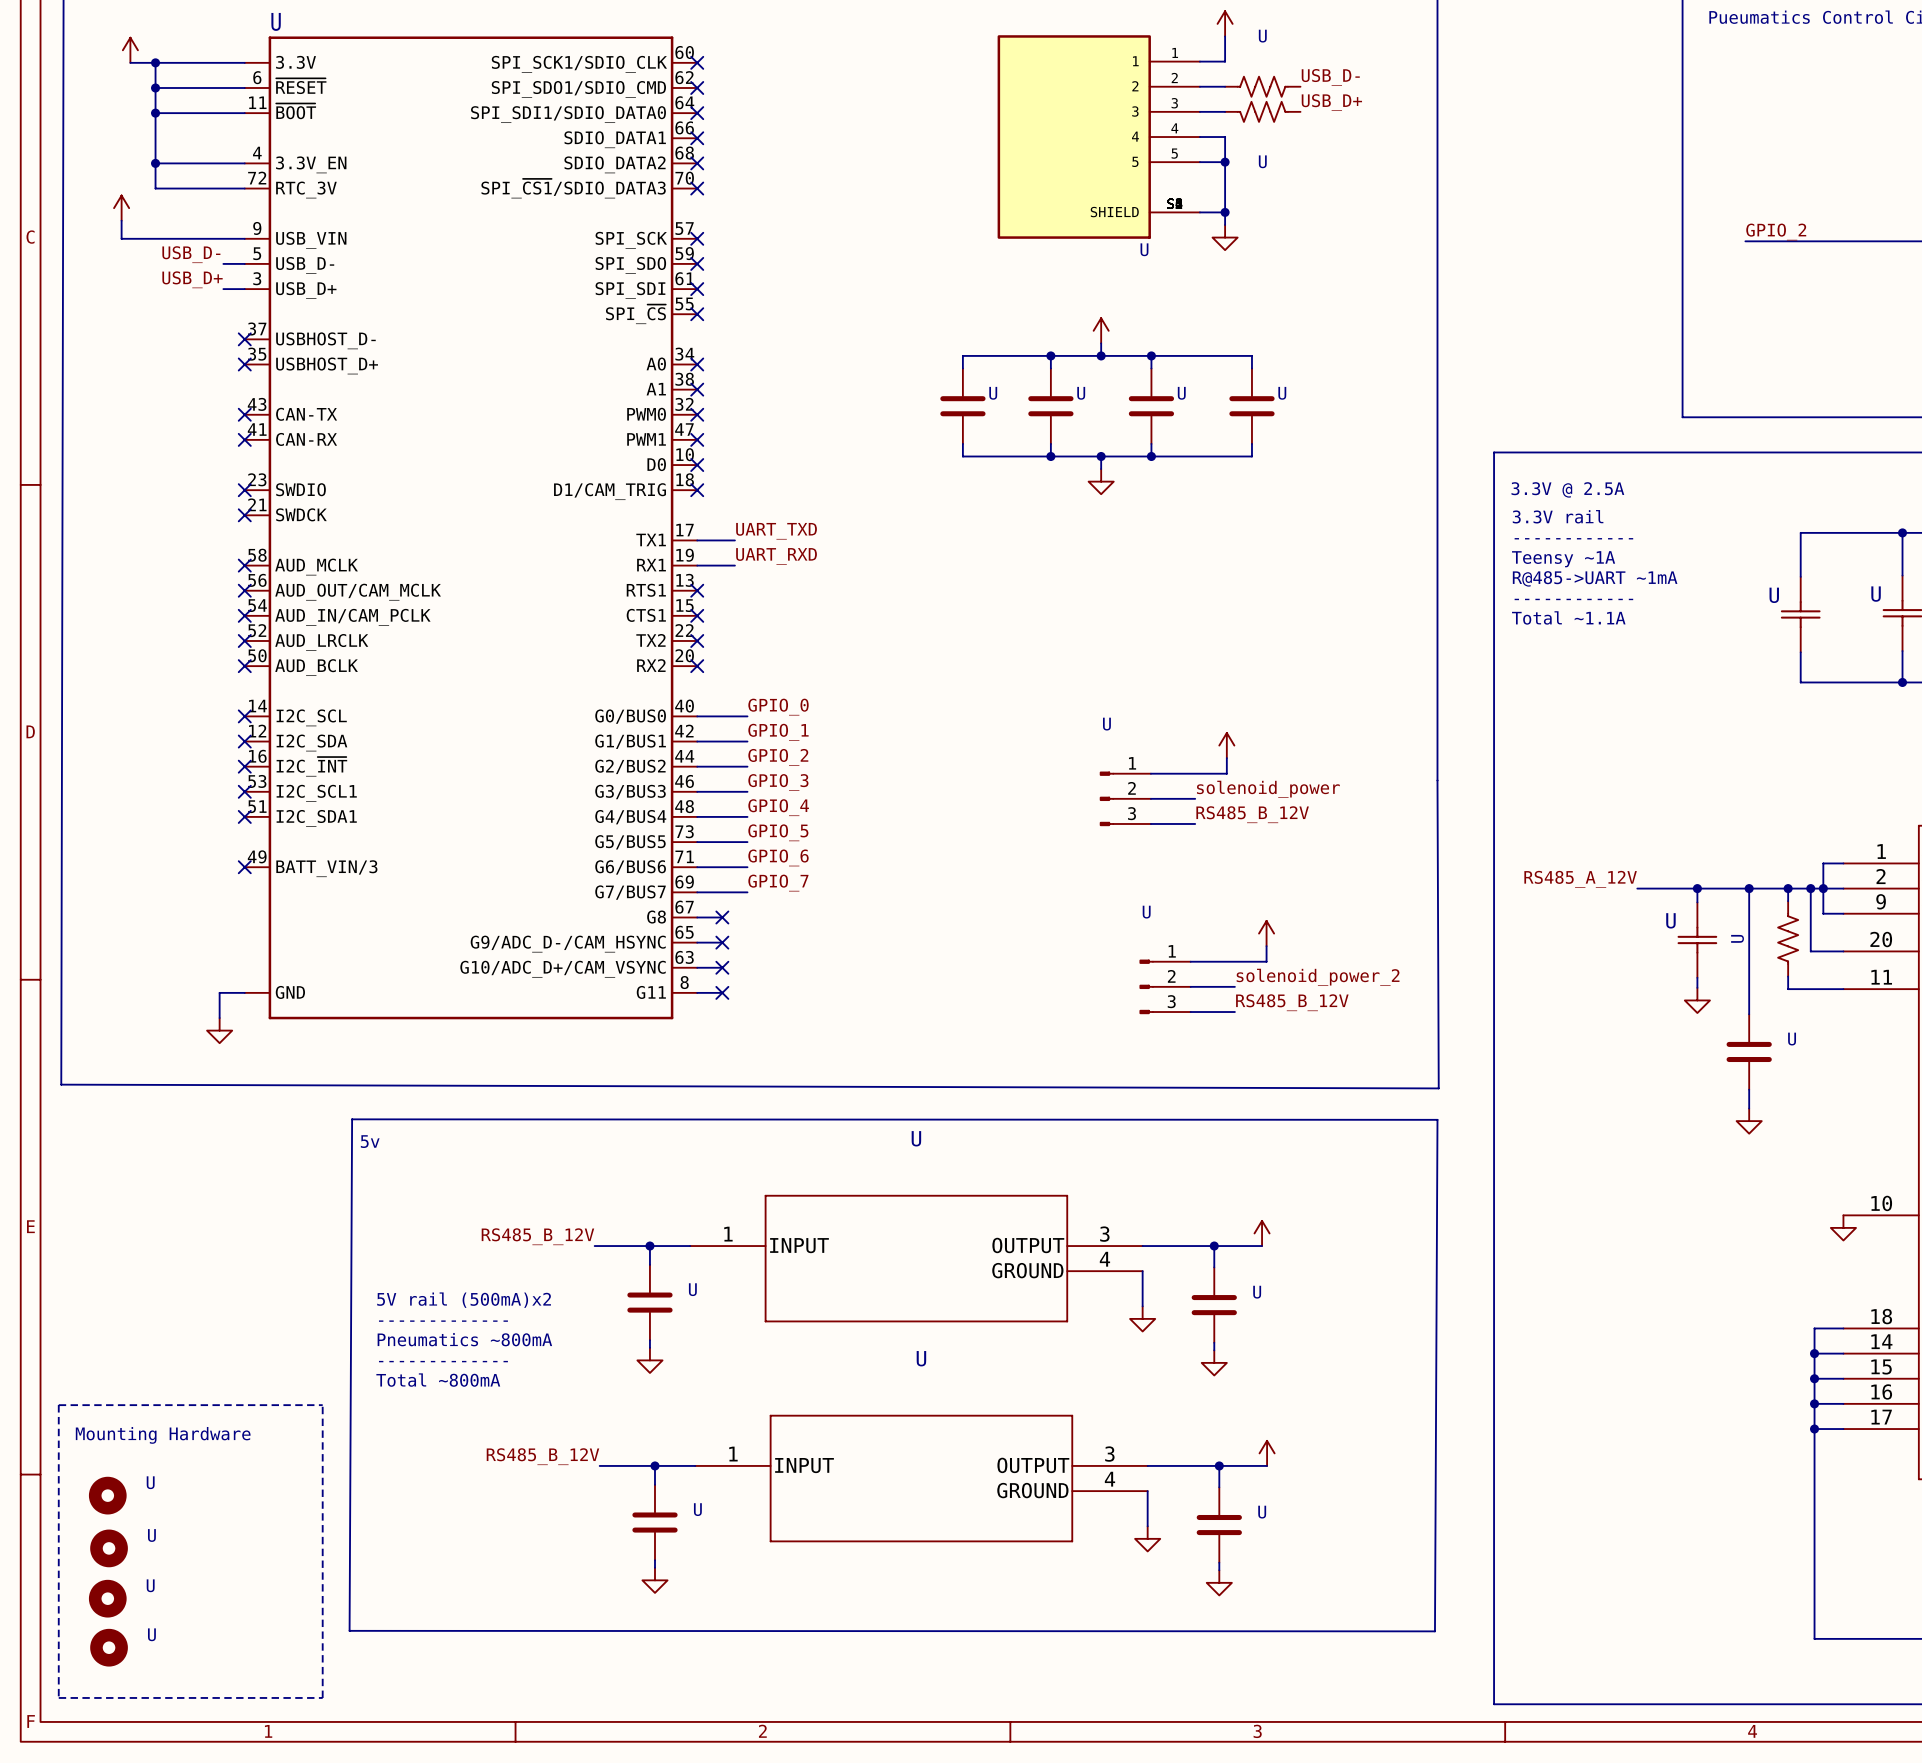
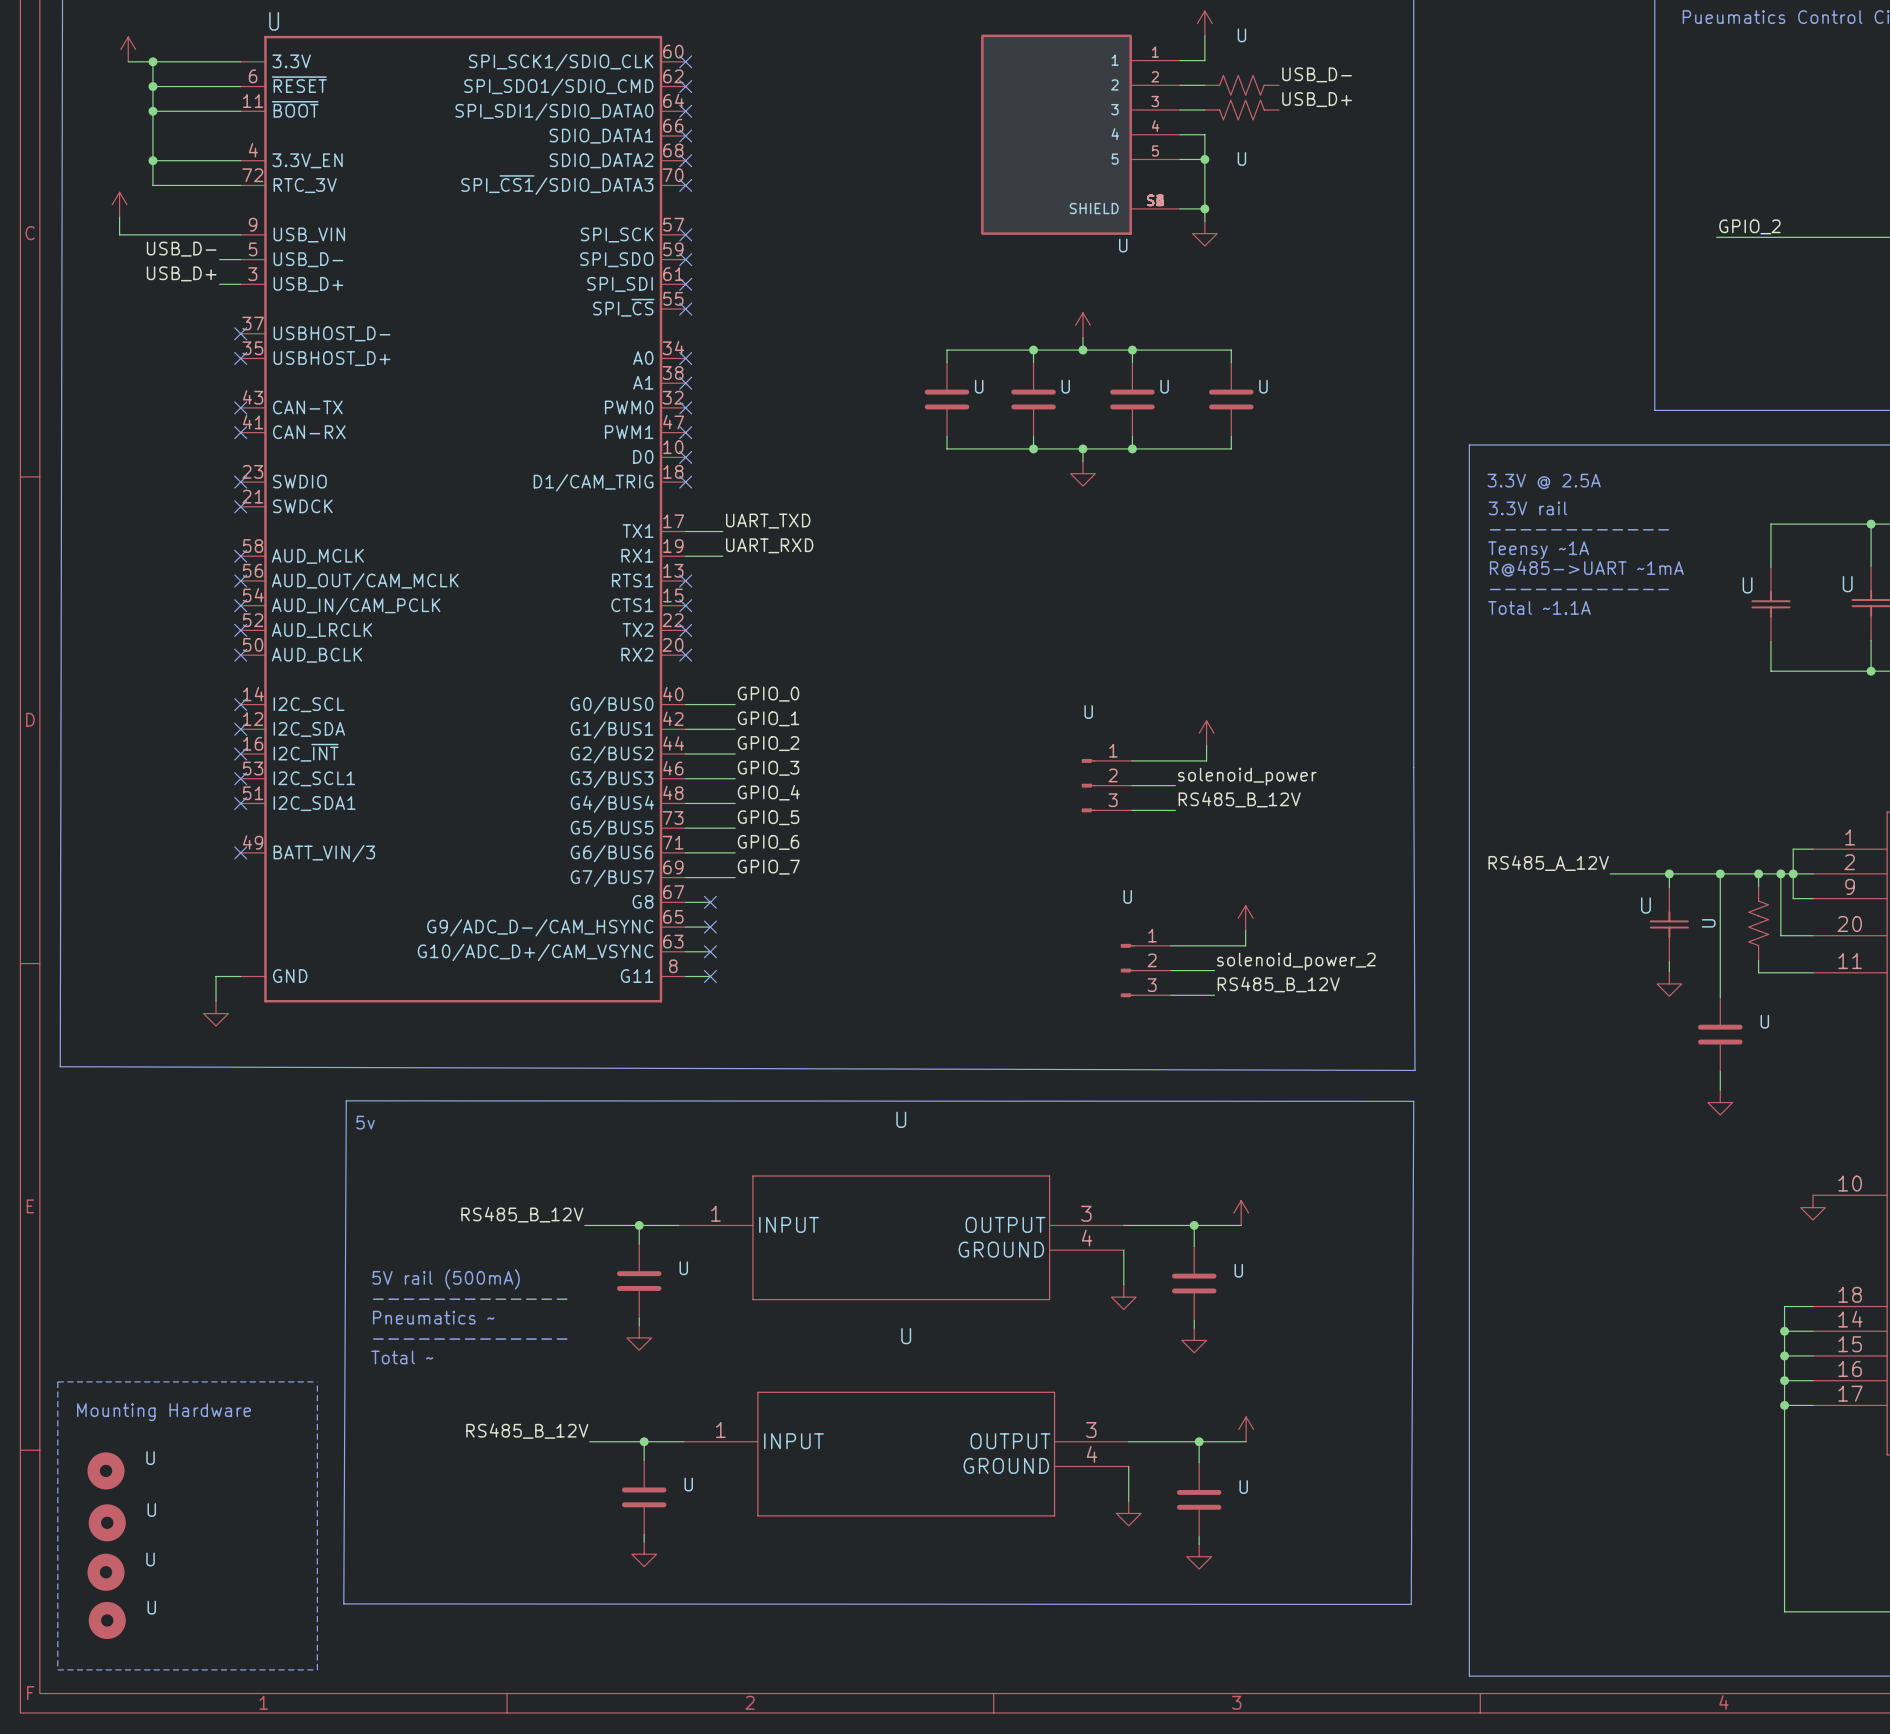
text: 5V rail (500mA)x2 (464, 1300) -> 5V rail (500mA) (446, 1279)
text: Pneumatics ~800mA (464, 1339) -> Pneumatics ~ (433, 1317)
text: Total ~800mA (438, 1380) -> Total ~ (402, 1357)

